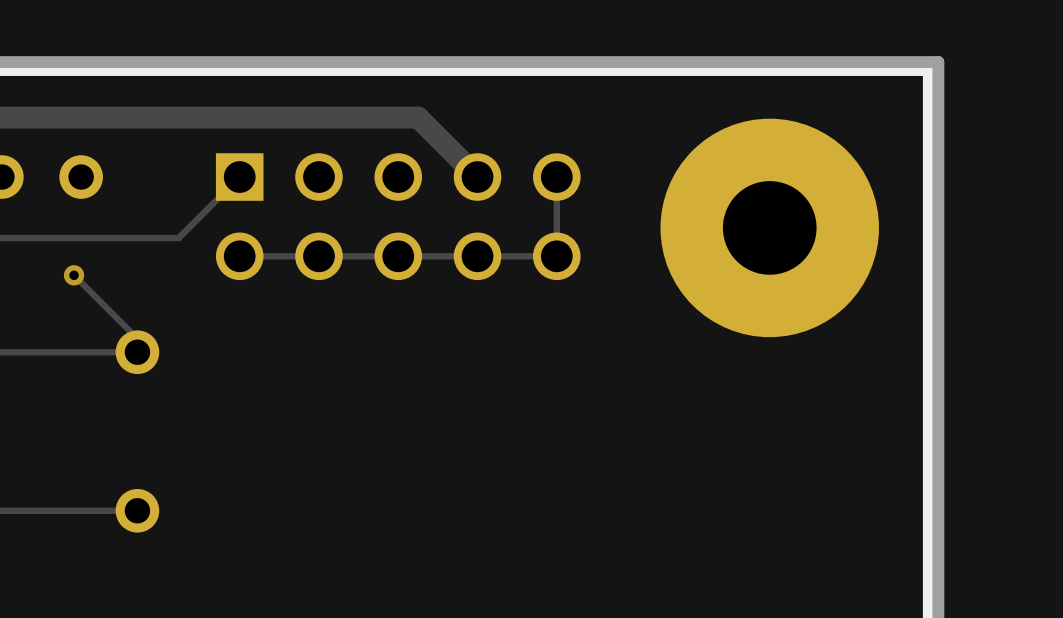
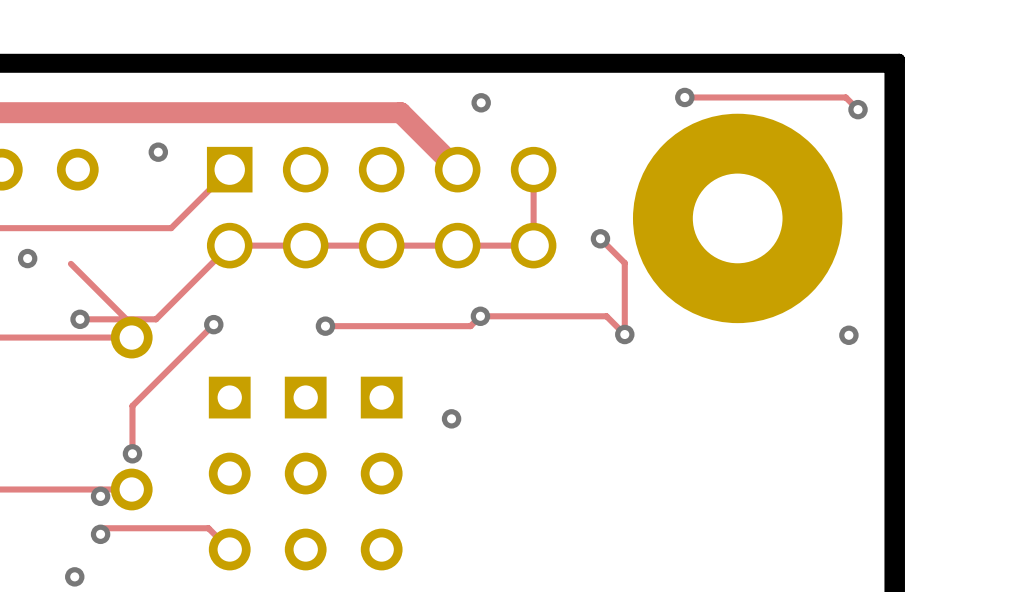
track: none -> (684, 97) (845, 97) (858, 109)
via: none -> (684, 97)
via: none -> (481, 102)
via: none -> (858, 109)
via: none -> (158, 152)
track: none -> (600, 238) (624, 263) (624, 334) (606, 316) (480, 316) (470, 326) (325, 326)
via: none -> (600, 238)
track: none -> (229, 245) (156, 319) (80, 319)
via: none -> (27, 258)
via: (74, 275) -> none
via: none -> (480, 316)
via: none -> (80, 319)
track: none -> (213, 324) (132, 405) (132, 453)
via: none -> (213, 324)
via: none -> (325, 326)
via: none -> (624, 334)
via: none -> (848, 335)
via: none -> (451, 418)
via: none -> (132, 453)
part: none -> (229, 473)
part: none -> (305, 473)
part: none -> (381, 473)
via: none -> (100, 496)
track: none -> (100, 534) (100, 528) (208, 528) (229, 549)
via: none -> (100, 534)
via: none -> (74, 576)

